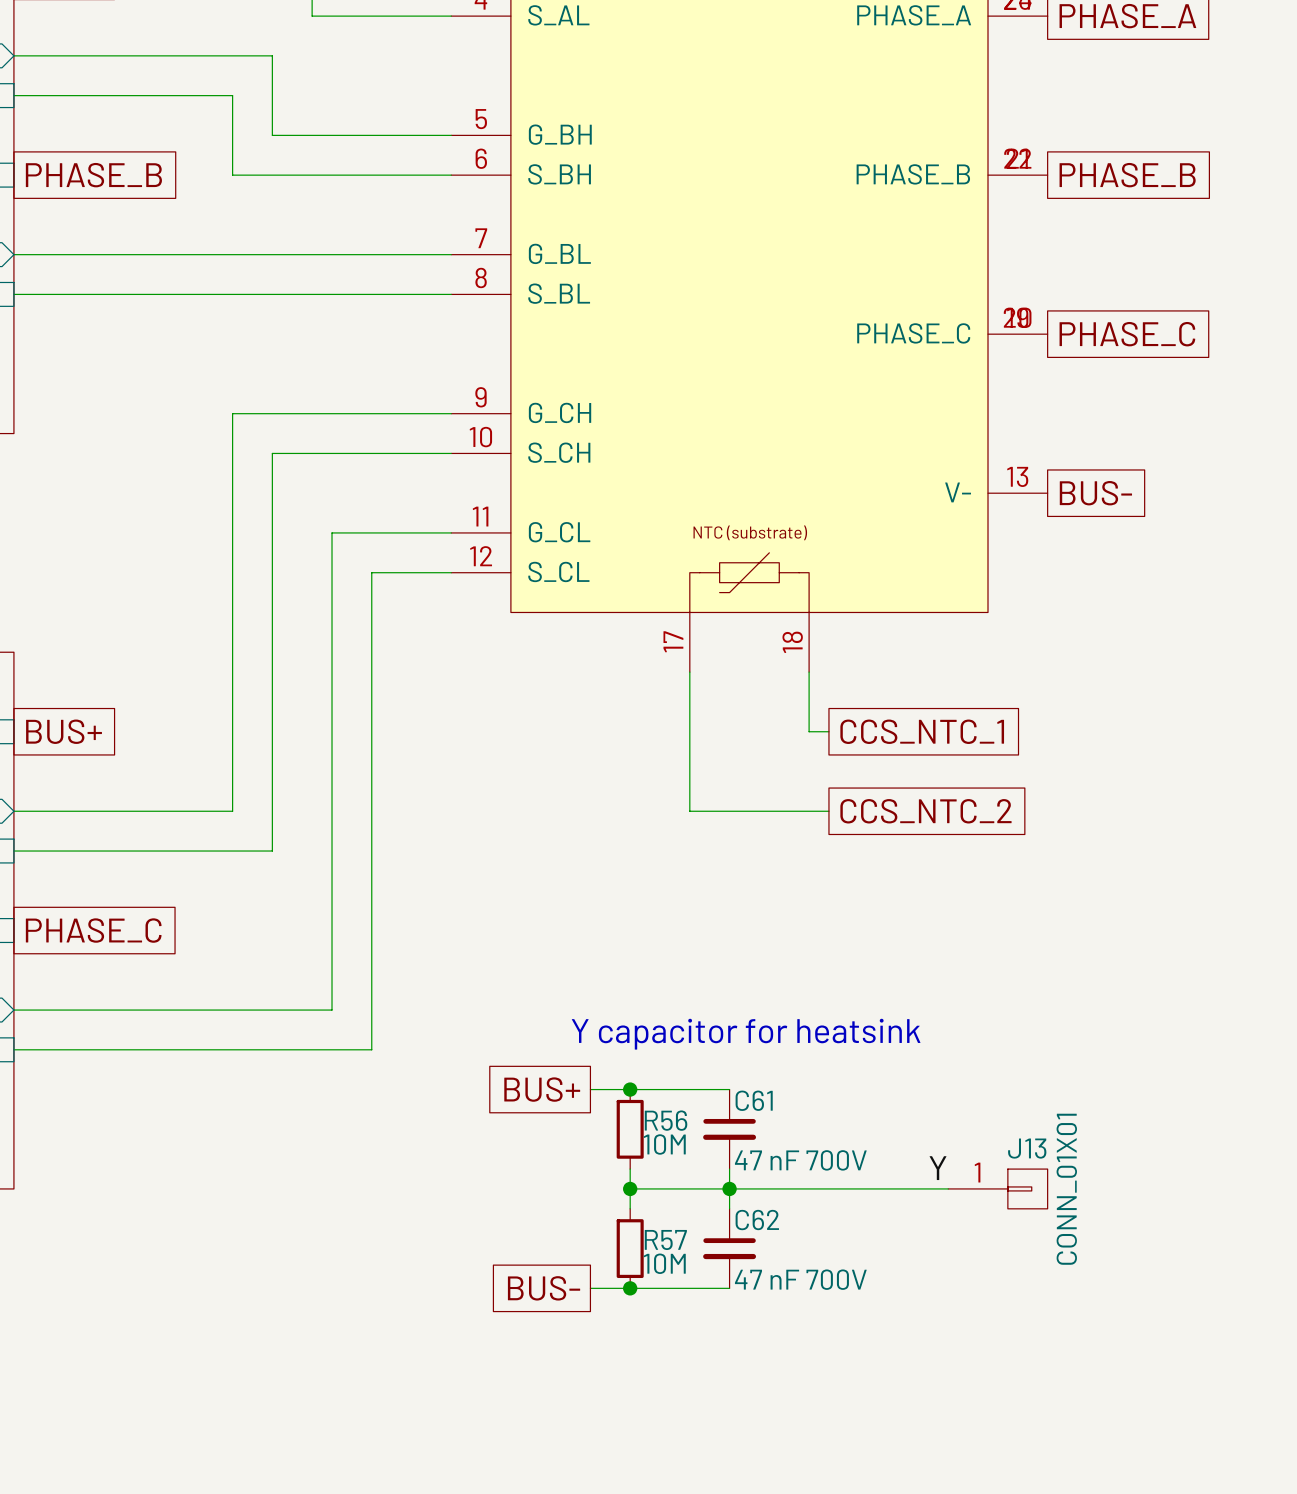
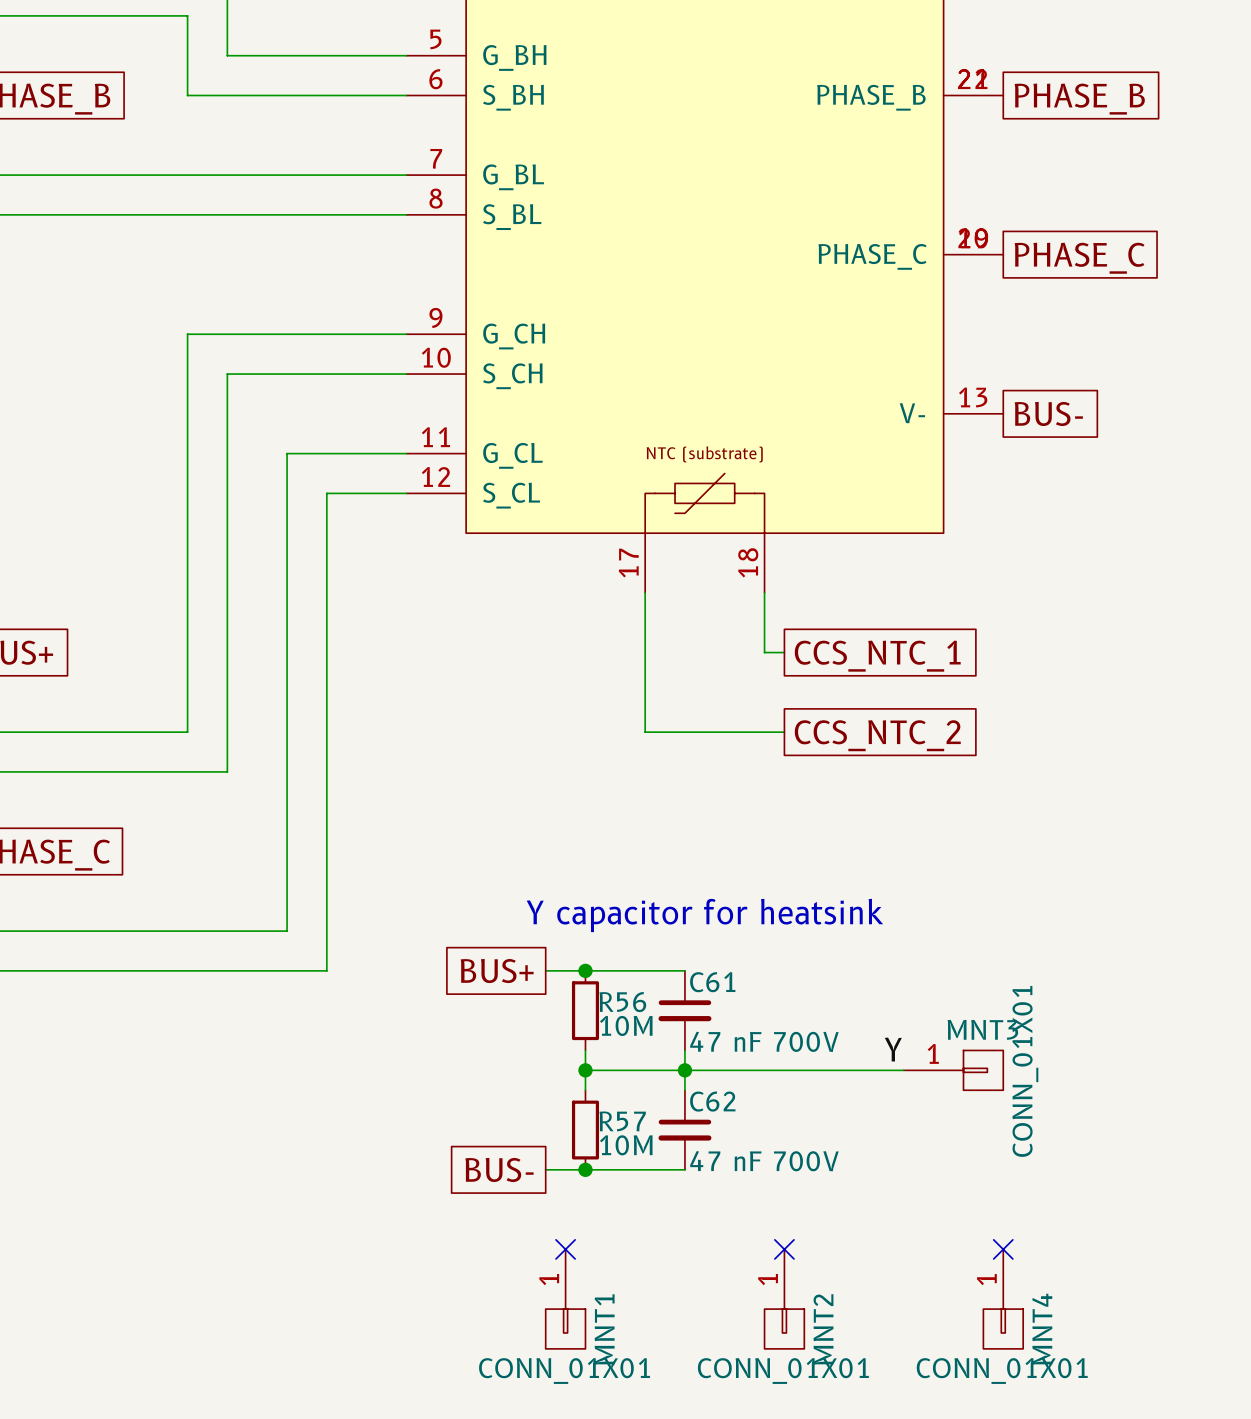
text position: Y capacitor for heatsink (746, 1034) -> Y capacitor for heatsink (704, 915)
junction: none -> (585, 970)
global label position: BUS+ (542, 1089) -> BUS+ (497, 971)
wire: (590, 1089) (729, 1089) -> (545, 970) (684, 970)
junction: (630, 1089) -> none
R56 position: (630, 1129) -> (585, 1010)
C61 position: (729, 1129) -> (684, 1010)
junction: none -> (585, 1070)
MNT3: none -> CONN_01X01 (953, 1070)
label position: Y (938, 1168) -> Y (893, 1049)
wire: (630, 1169) (630, 1208) -> (585, 1090) (585, 1050)
wire: (630, 1188) (948, 1188) -> (585, 1070) (903, 1070)
junction: (630, 1188) -> none
junction position: (729, 1188) -> (684, 1070)
J13: CONN_01X01 (997, 1188) -> none
R57 position: (630, 1248) -> (585, 1130)
junction: none -> (585, 1169)
C62 position: (729, 1248) -> (684, 1130)
global label position: BUS- (544, 1288) -> BUS- (499, 1169)
wire: (590, 1288) (729, 1288) -> (545, 1169) (684, 1169)
junction: (630, 1288) -> none
no-connect mark: none -> (565, 1249)
no-connect mark: none -> (784, 1249)
no-connect mark: none -> (1003, 1249)
MNT1: none -> CONN_01X01 (565, 1299)
MNT2: none -> CONN_01X01 (784, 1299)
MNT4: none -> CONN_01X01 (1003, 1299)

